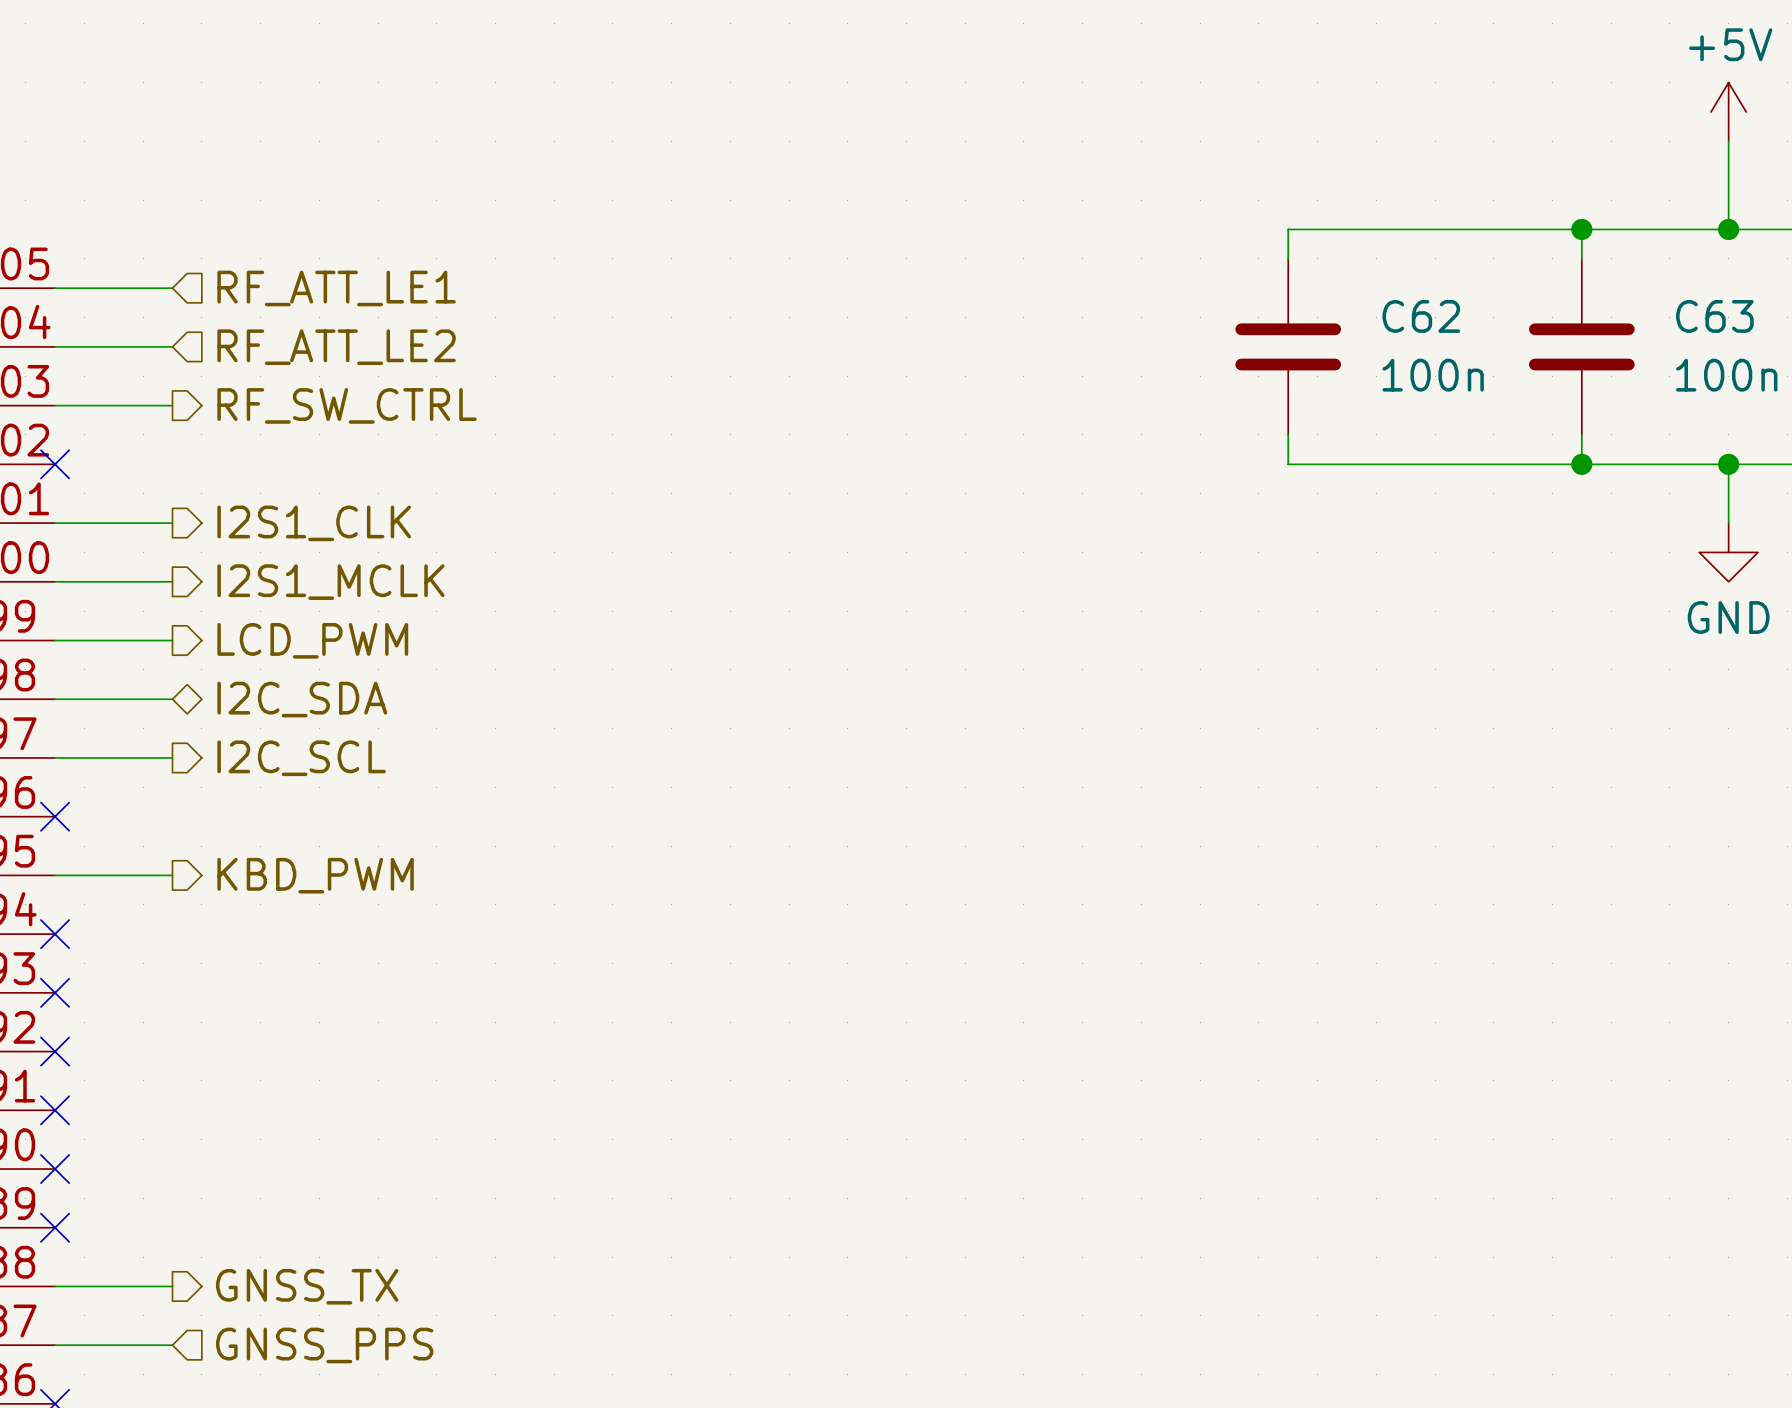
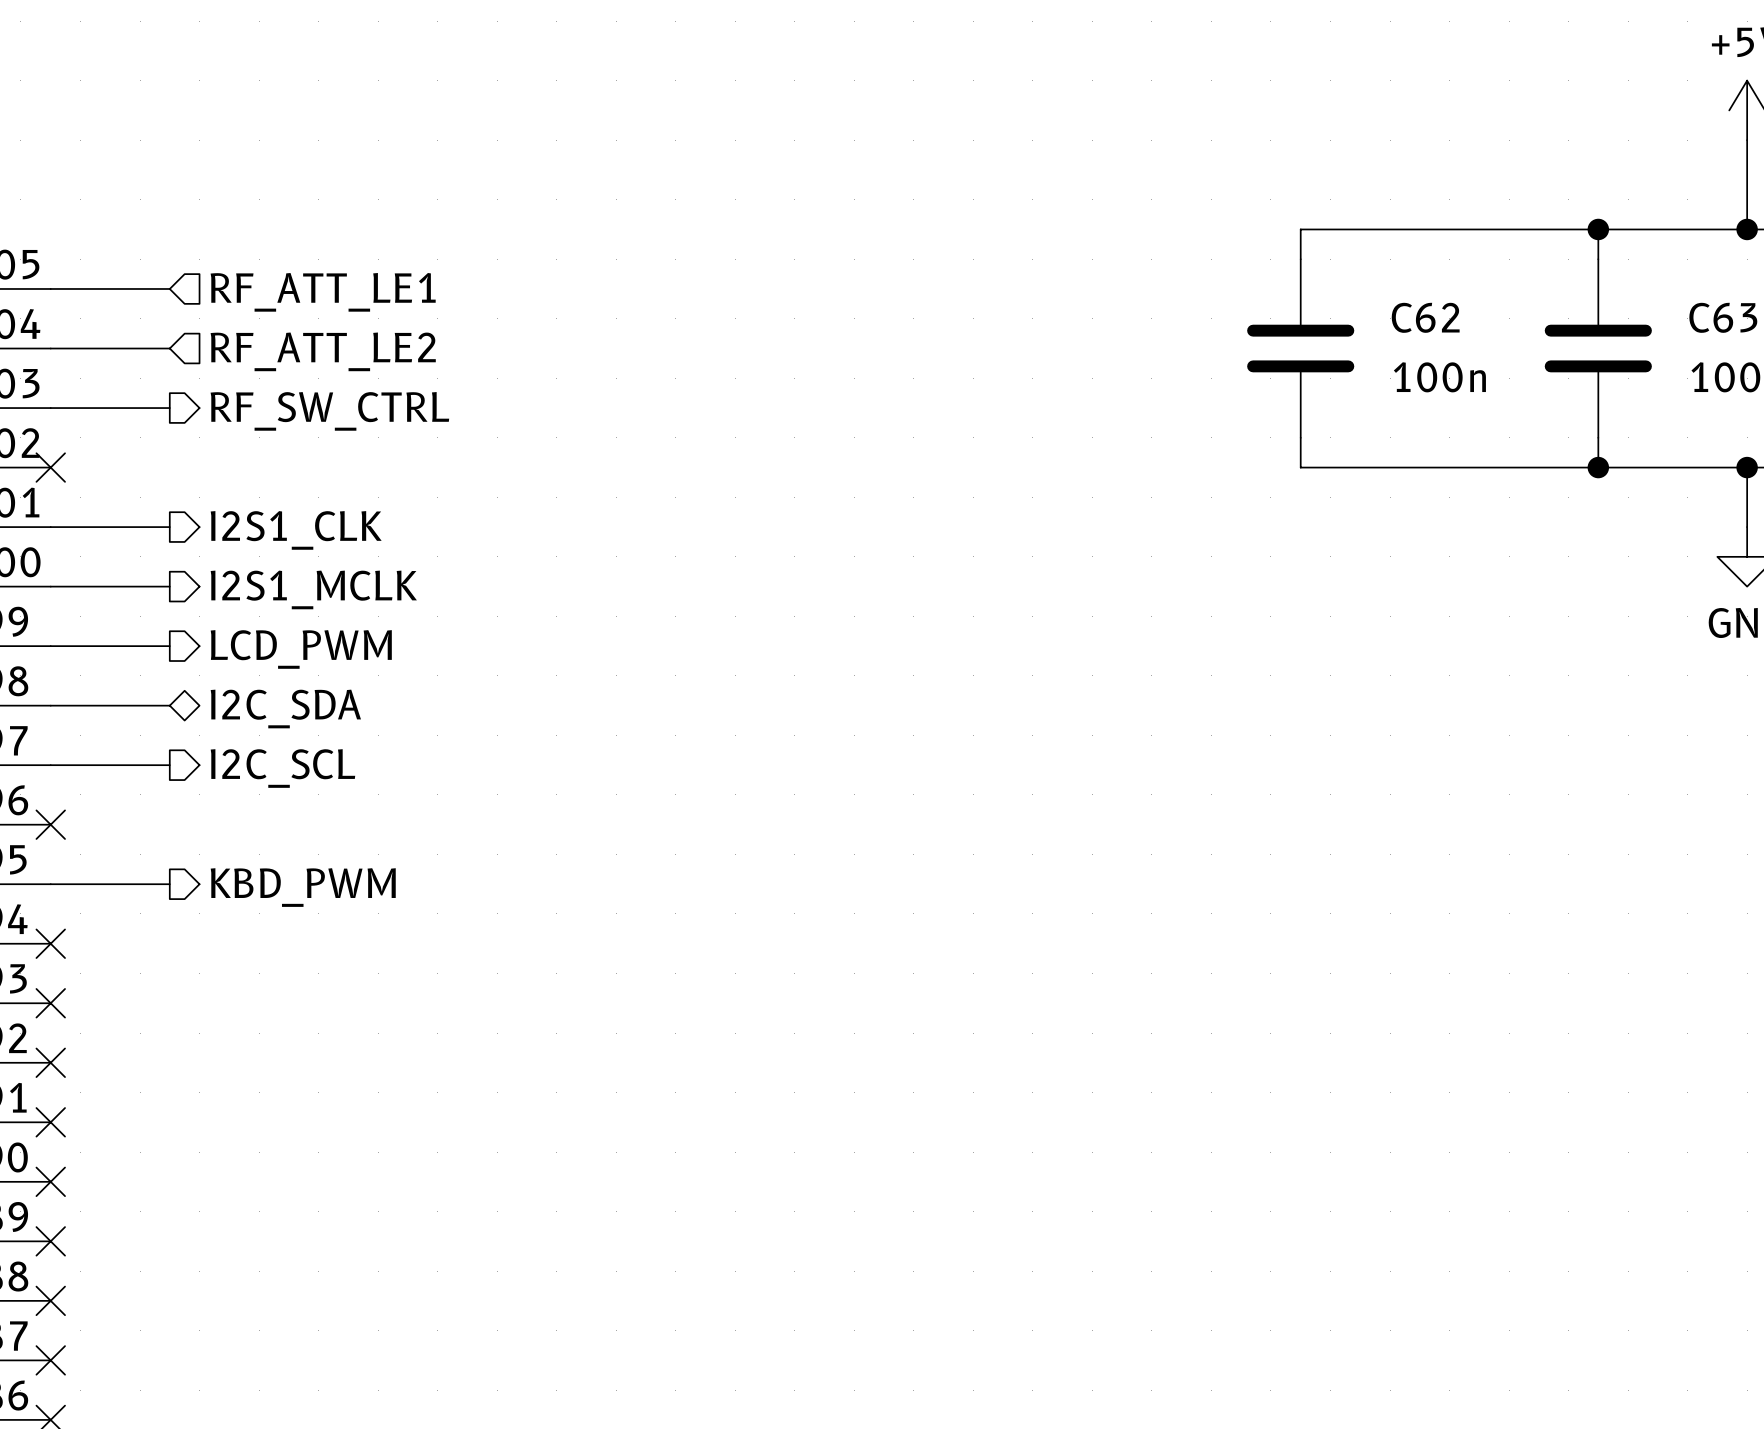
wire: (55, 1286) (172, 1286) -> none
no-connect mark: none -> (50, 1300)
hierarchical label: GNSS_TX (307, 1286) -> none
wire: (55, 1345) (172, 1345) -> none
no-connect mark: none -> (50, 1360)
hierarchical label: GNSS_PPS (324, 1345) -> none

